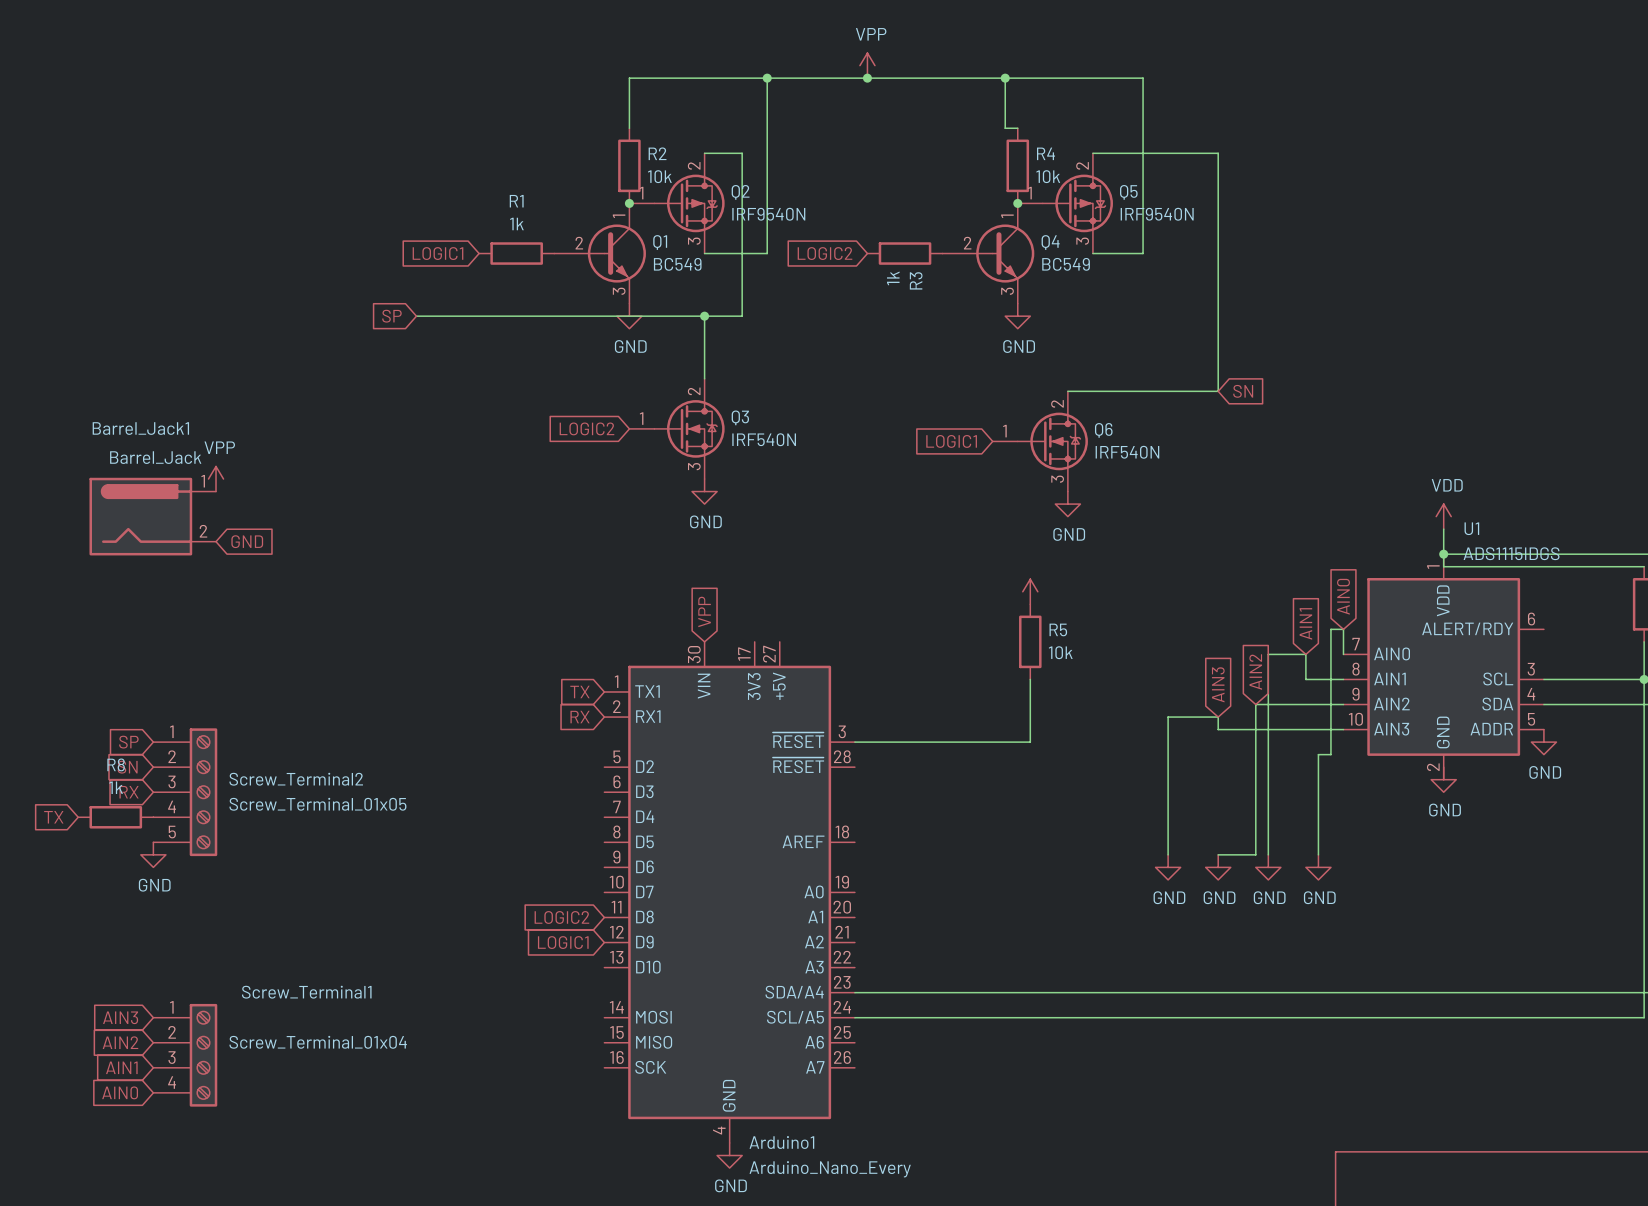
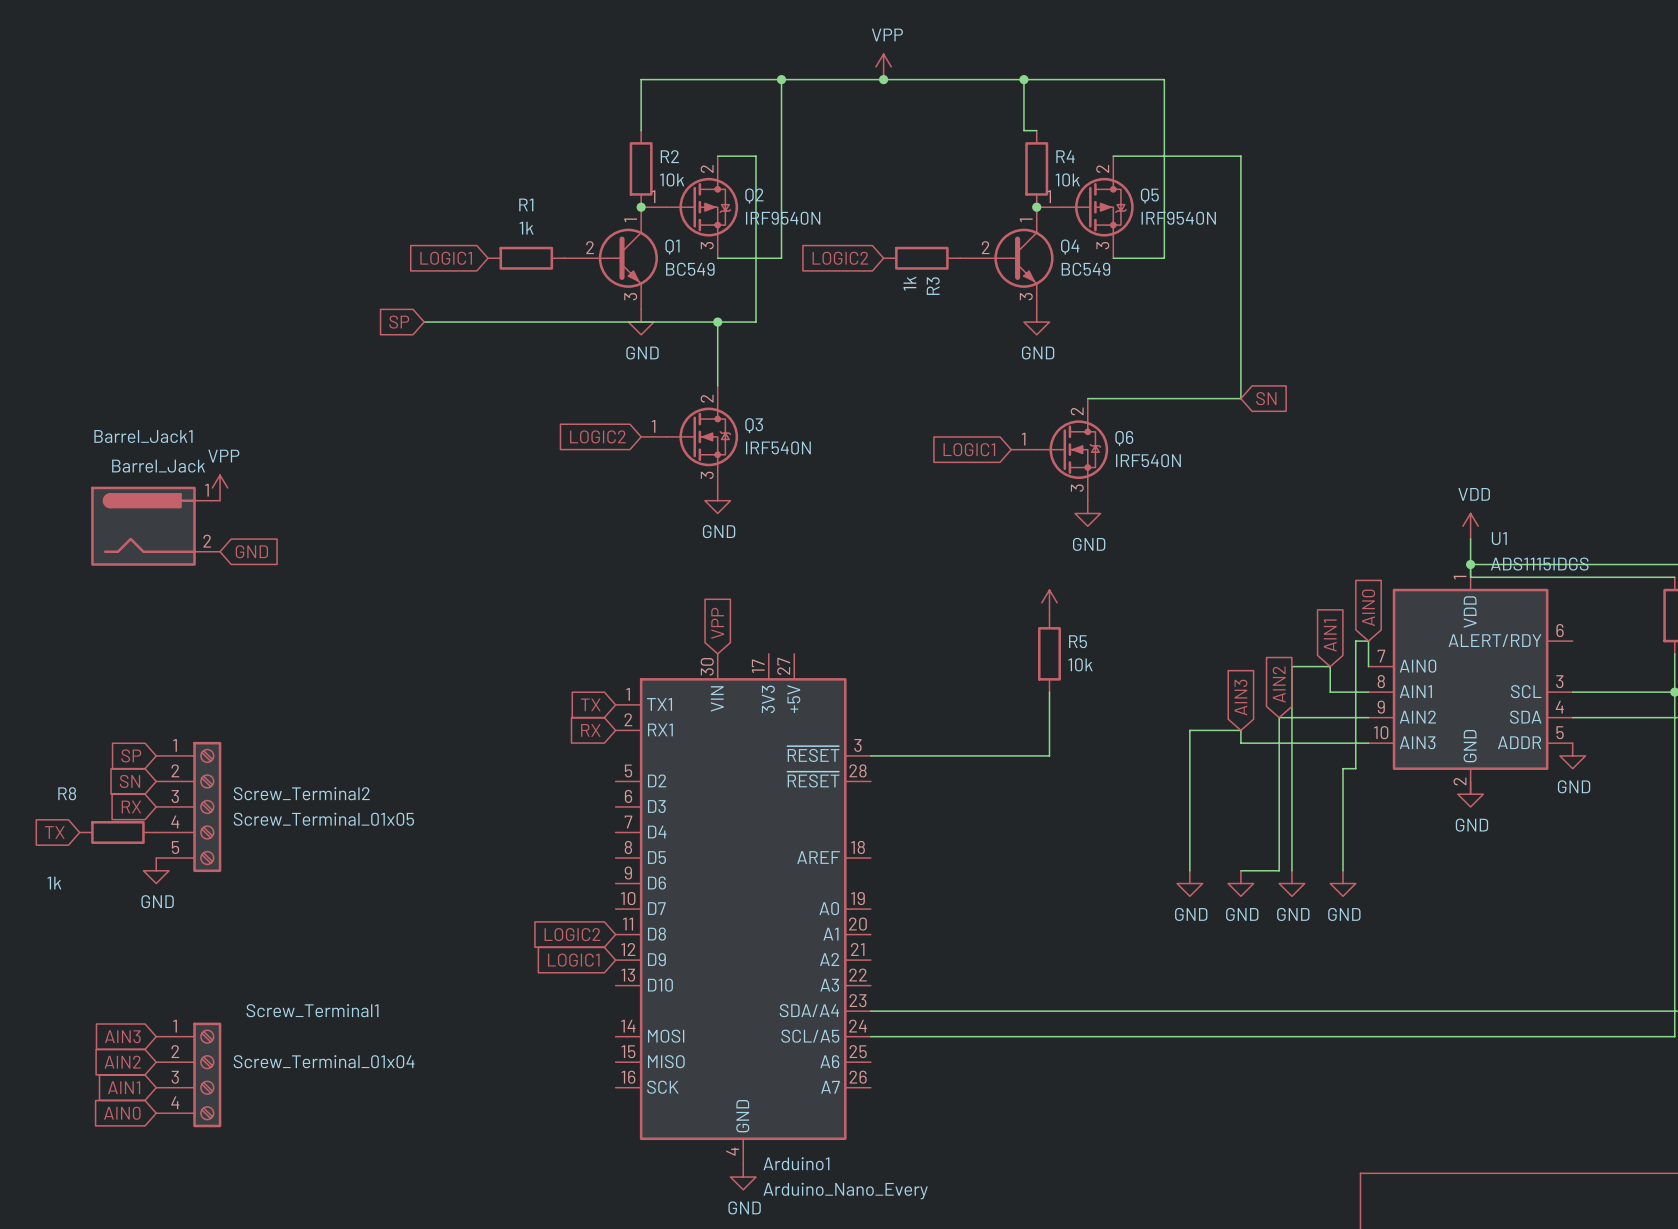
R8 name position: R8 (116, 764) -> R8 (67, 793)
R8 value position: 1k (116, 787) -> 1k (54, 883)

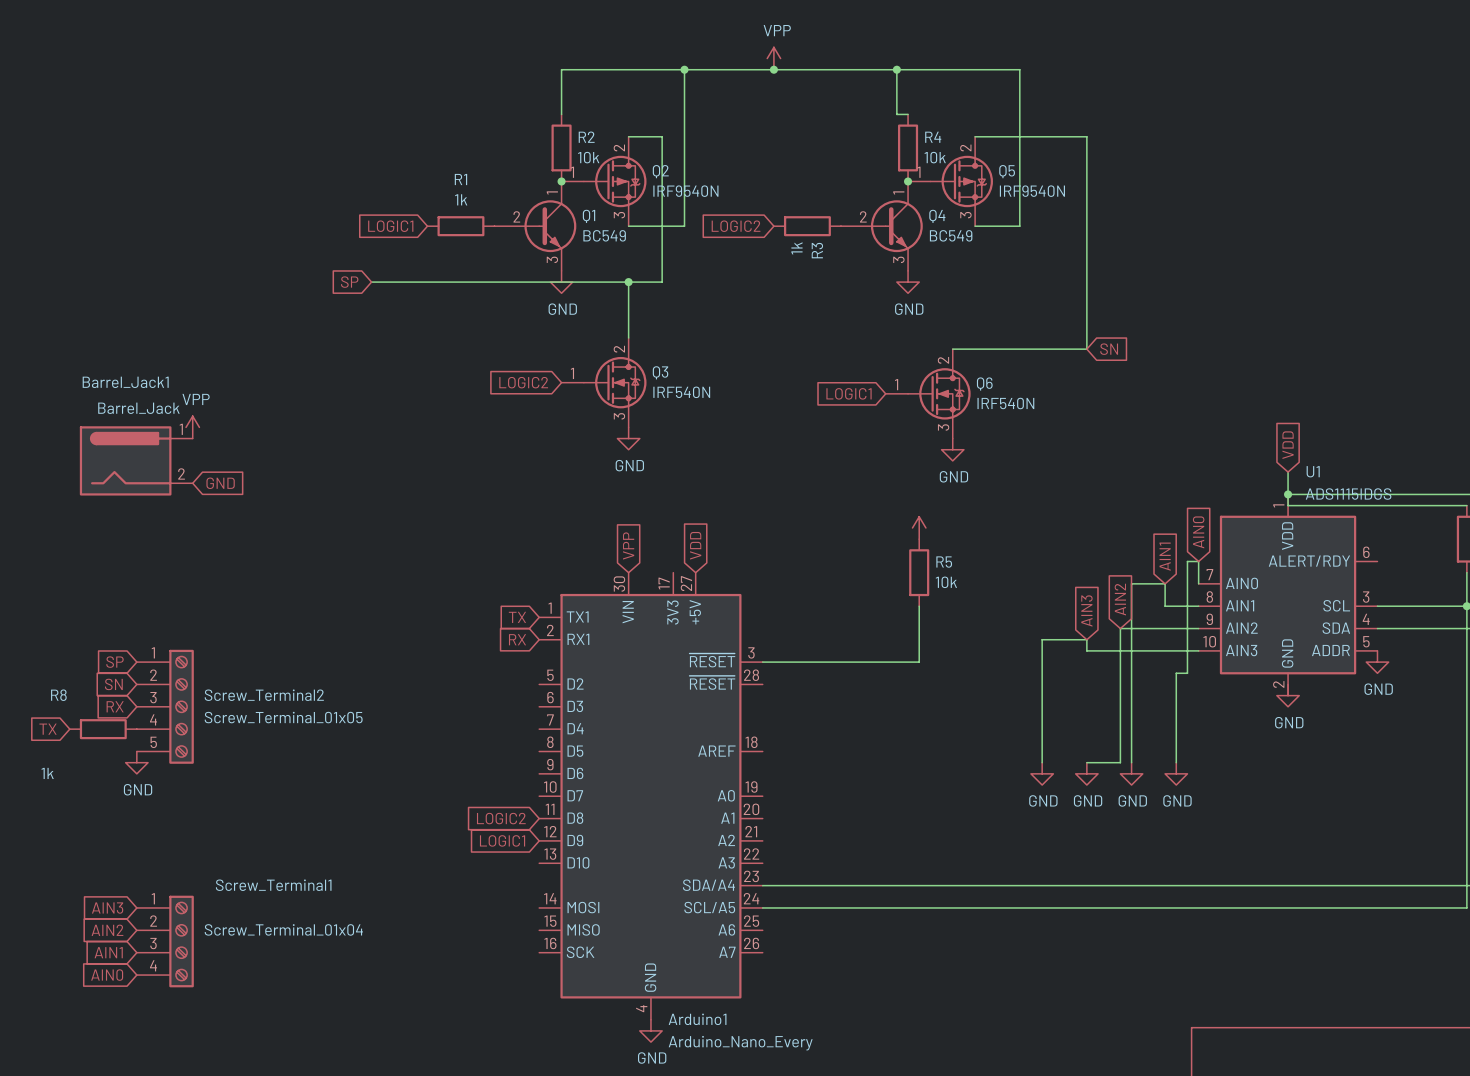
global label: none -> VDD (1288, 445)
power symbol: VDD (1470, 526) -> none
global label: none -> VDD (695, 545)

